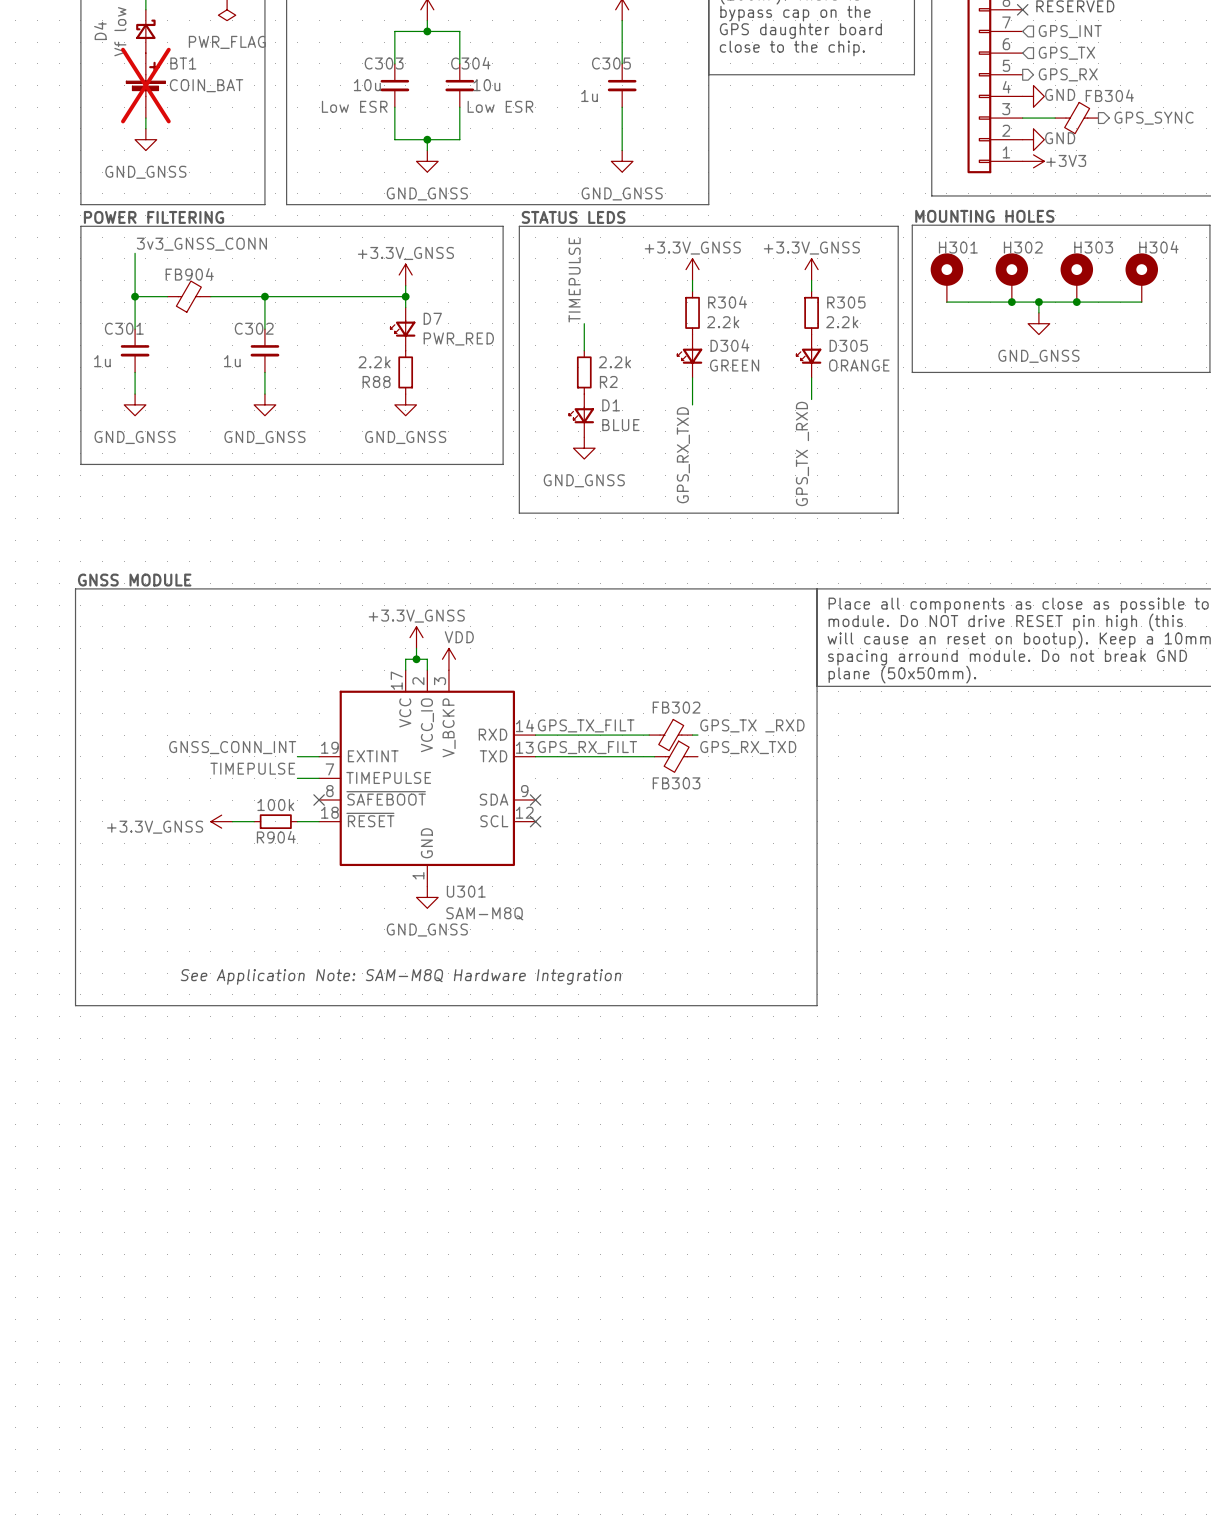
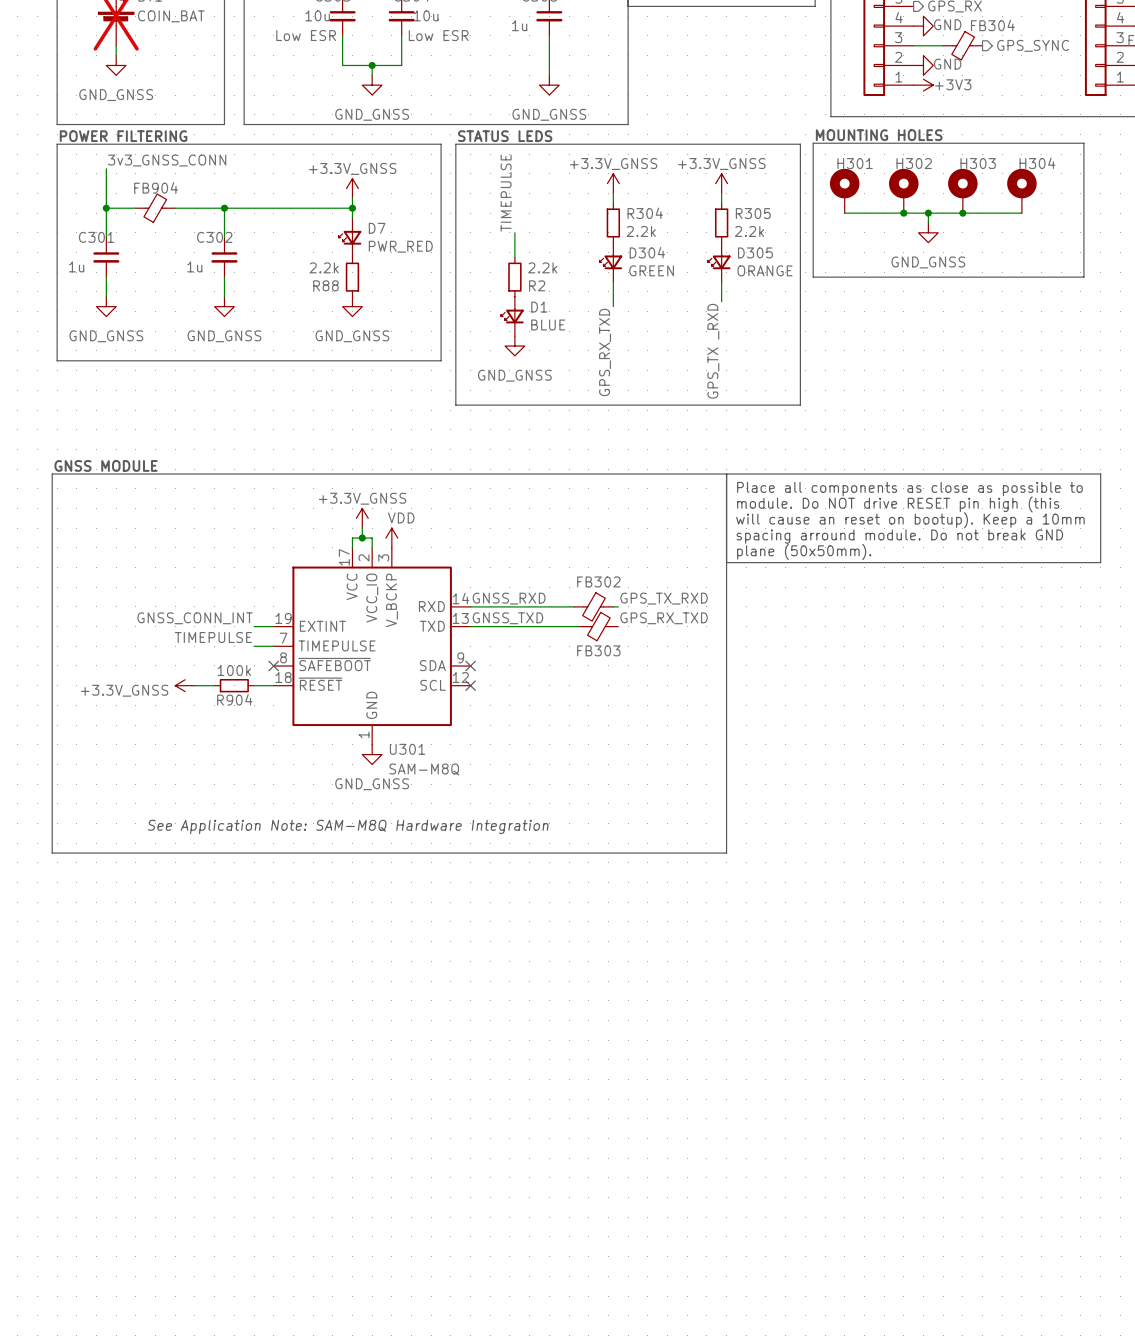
label: GPS_TX_FILT (586, 725) -> GNSS_RXD (509, 598)
label: GPS_TX _RXD (752, 725) -> GPS_TX_RXD (664, 598)
label: GPS_RX_FILT (587, 747) -> GNSS_TXD (507, 618)

